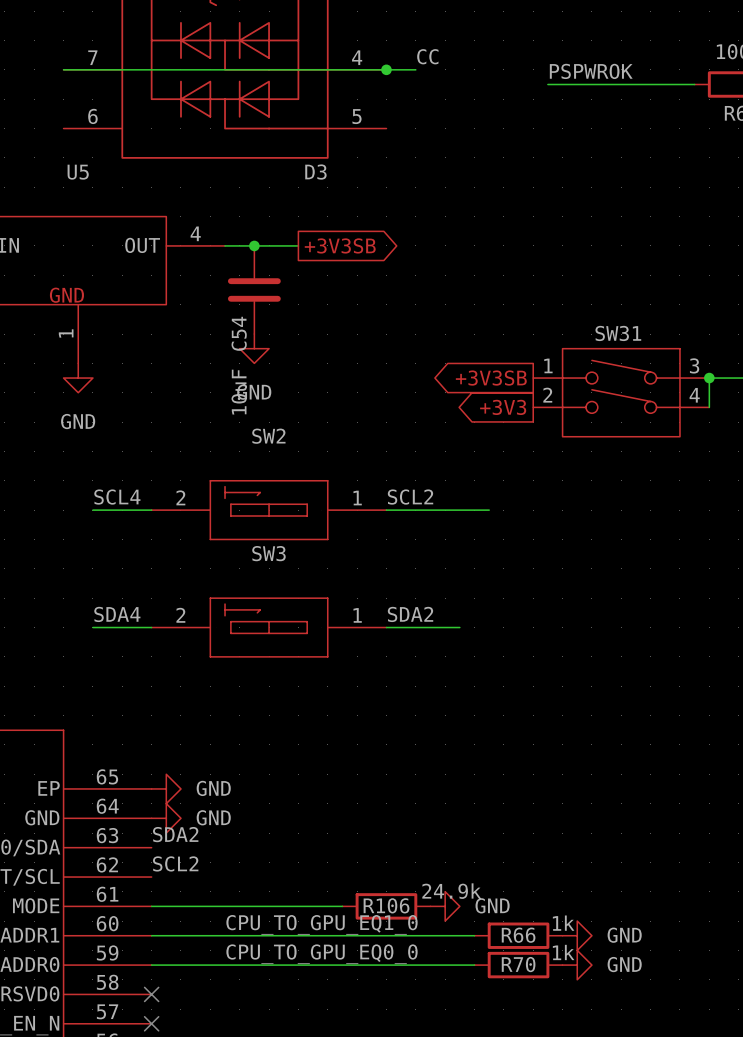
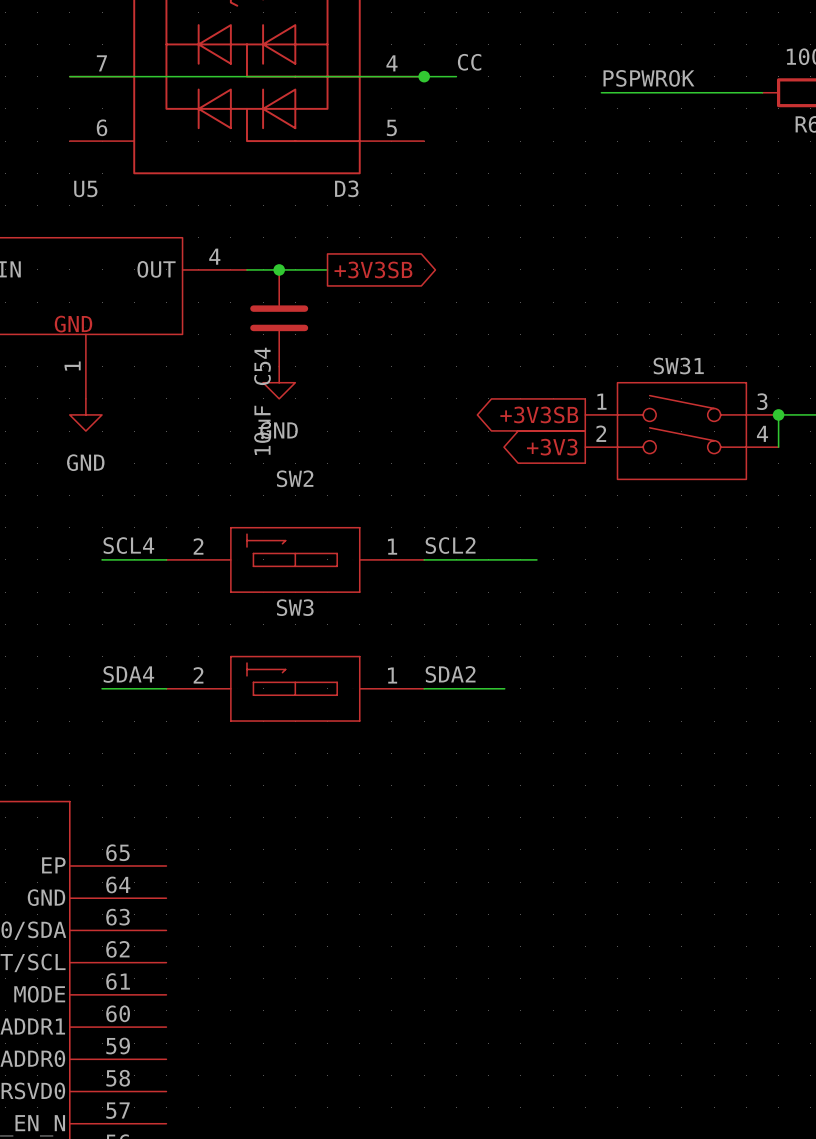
power symbol: GND (166, 788) -> none
power symbol: GND (166, 818) -> none
label: SDA2 (175, 834) -> none
label: SCL2 (175, 863) -> none
wire: (151, 906) (342, 906) -> none
R106: 24.9k (386, 906) -> none
power symbol: GND (445, 906) -> none
label: CPU_TO_GPU_EQ1_0 (322, 924) -> none
wire: (151, 935) (474, 935) -> none
R66: 1k (518, 935) -> none
power symbol: GND (577, 935) -> none
label: CPU_TO_GPU_EQ0_0 (322, 954) -> none
wire: (151, 965) (474, 965) -> none
R70: 1k (518, 965) -> none
power symbol: GND (577, 965) -> none
no-connect mark: (151, 994) -> none
no-connect mark: (151, 1023) -> none

